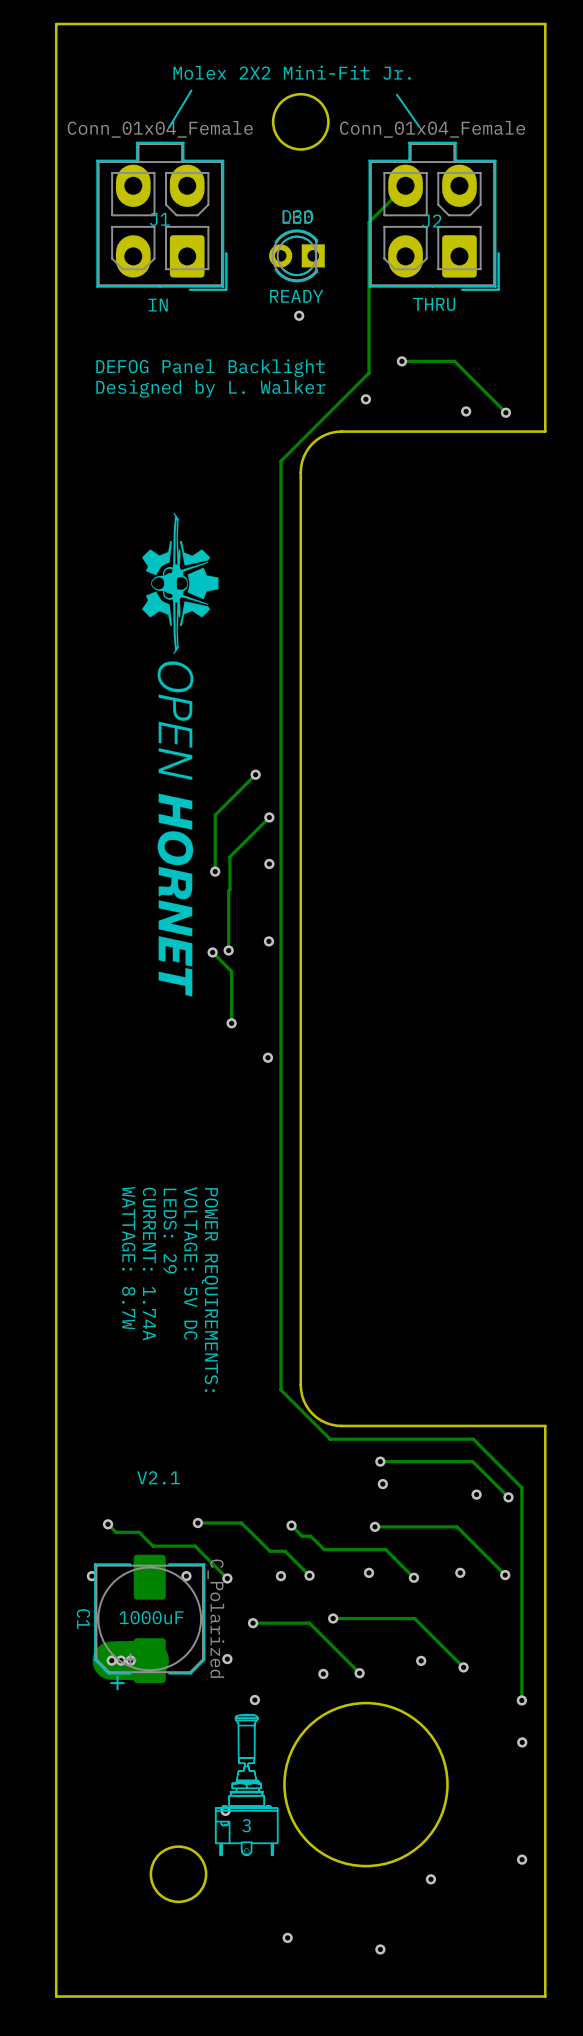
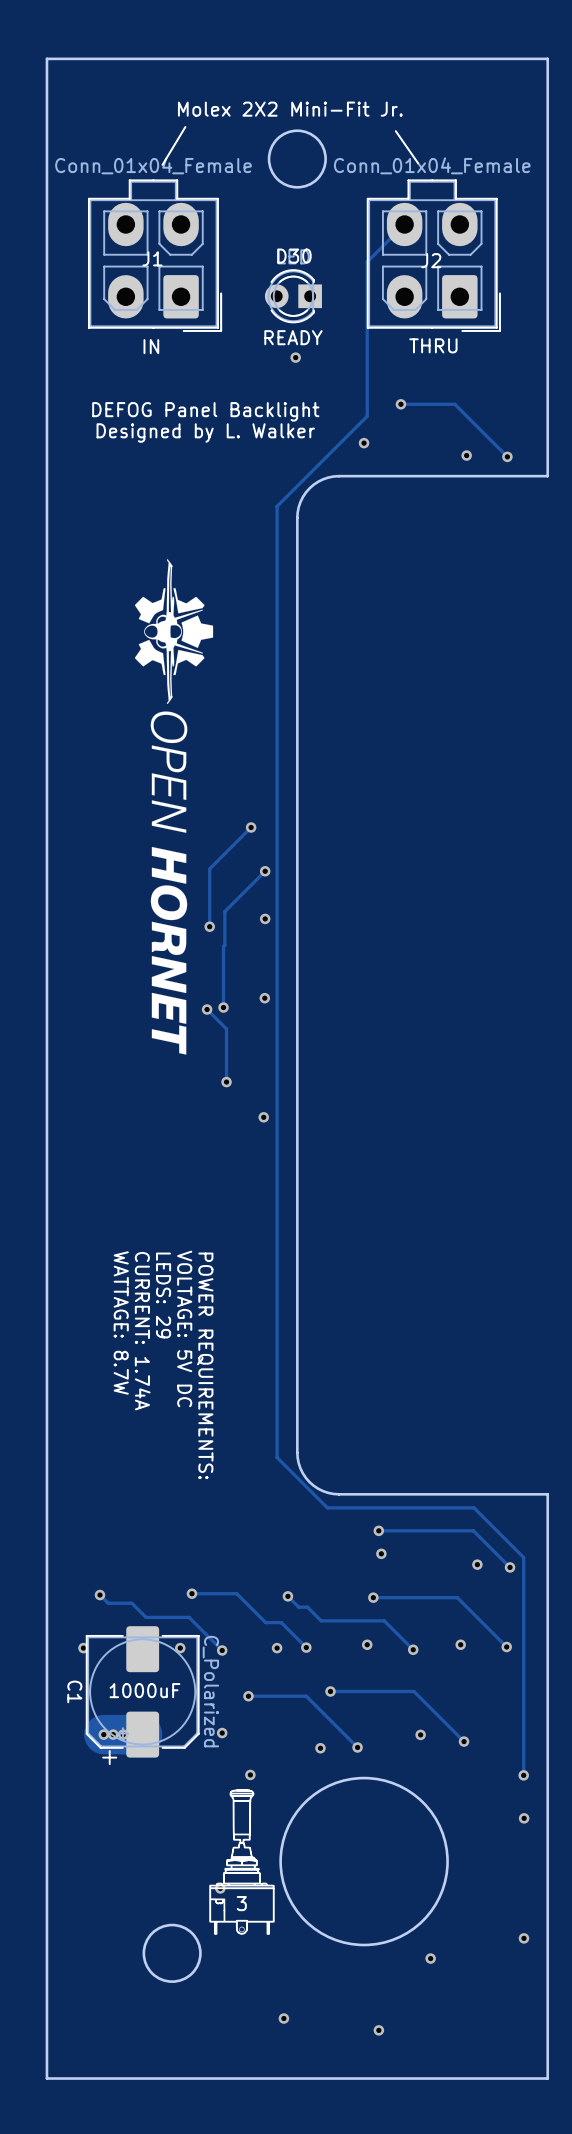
text: V2.1 (158, 1477) -> none

